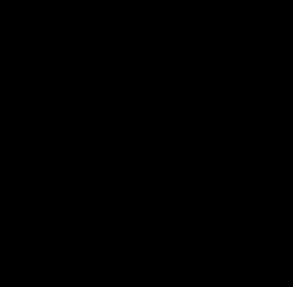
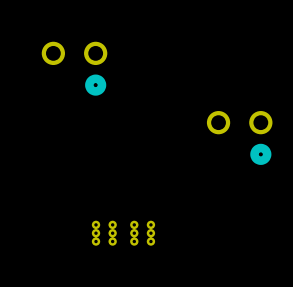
part: none -> (74, 68)
part: none -> (239, 137)
part: none -> (123, 233)

